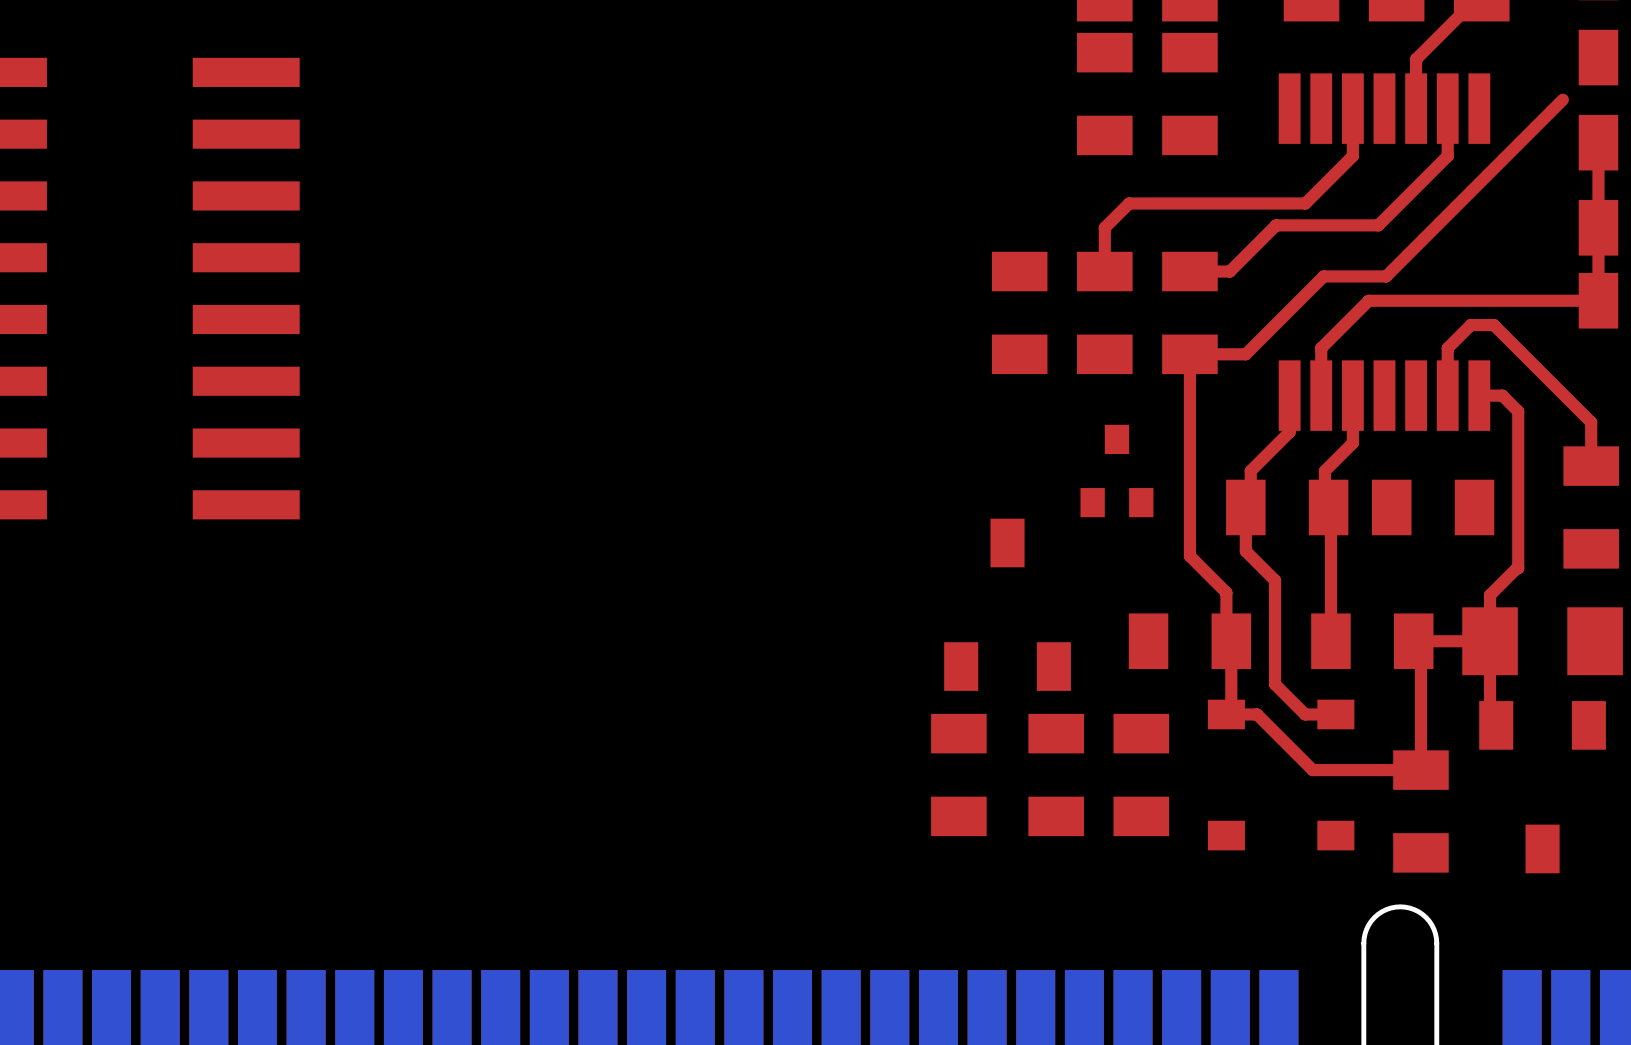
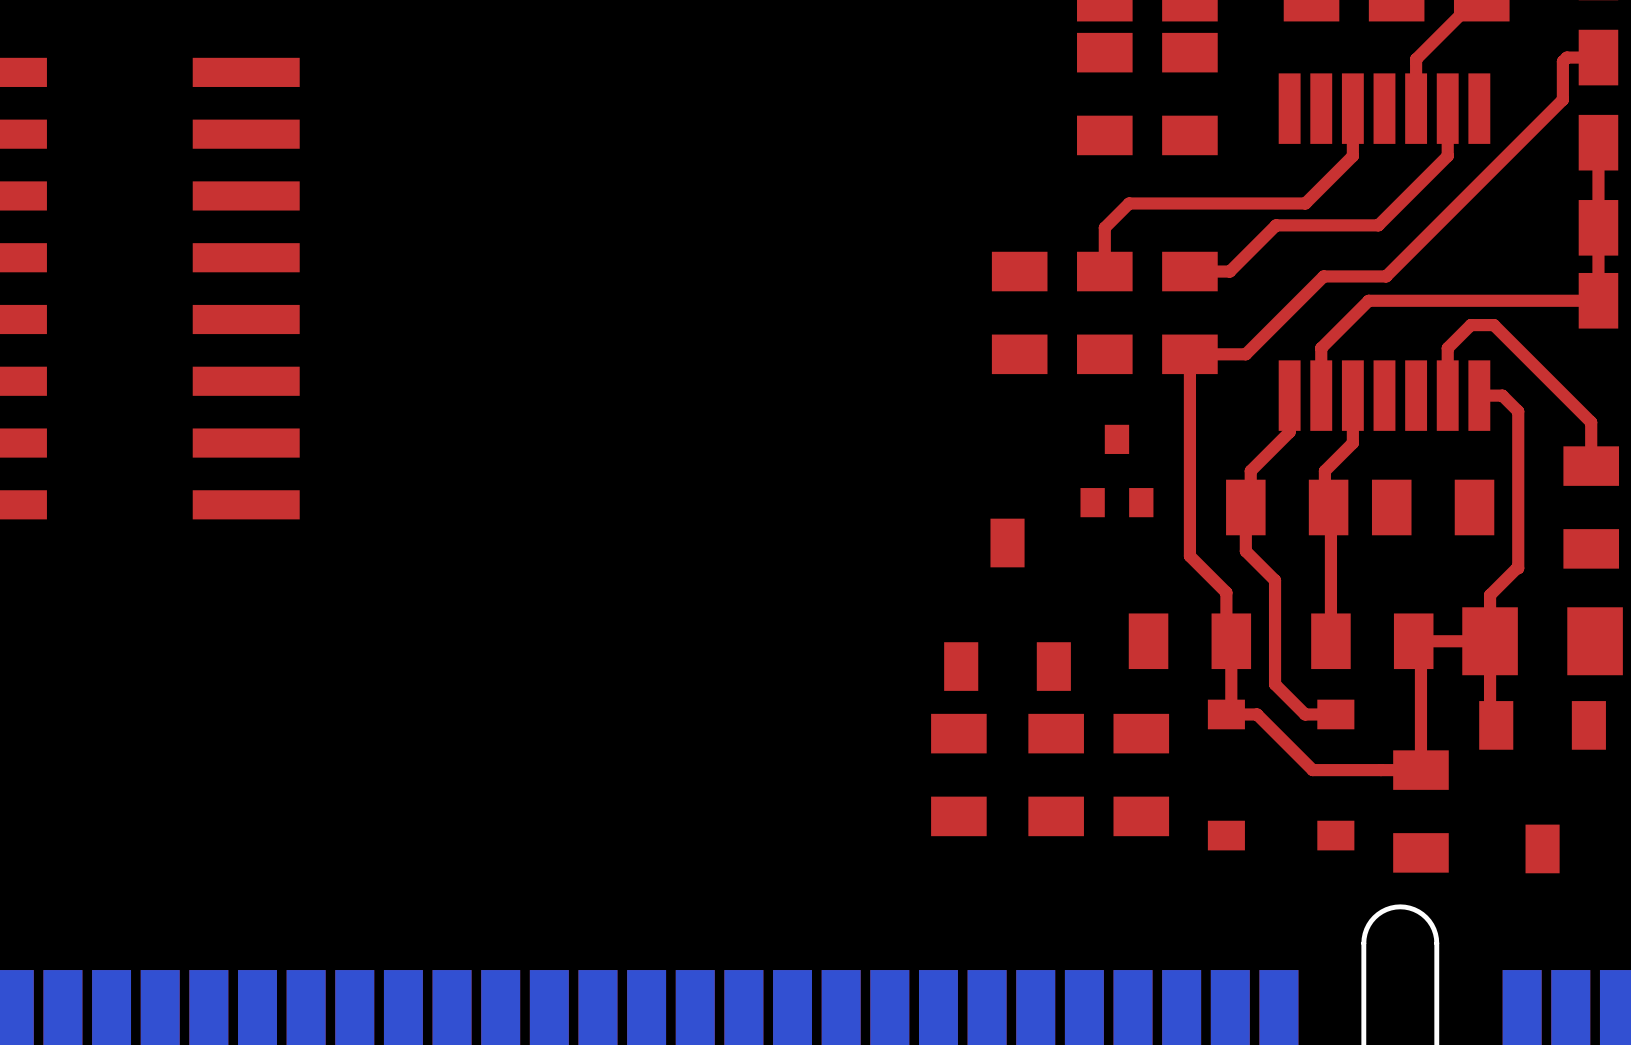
top track: none -> (1598, 57) (1566, 57) (1562, 61) (1562, 99)

